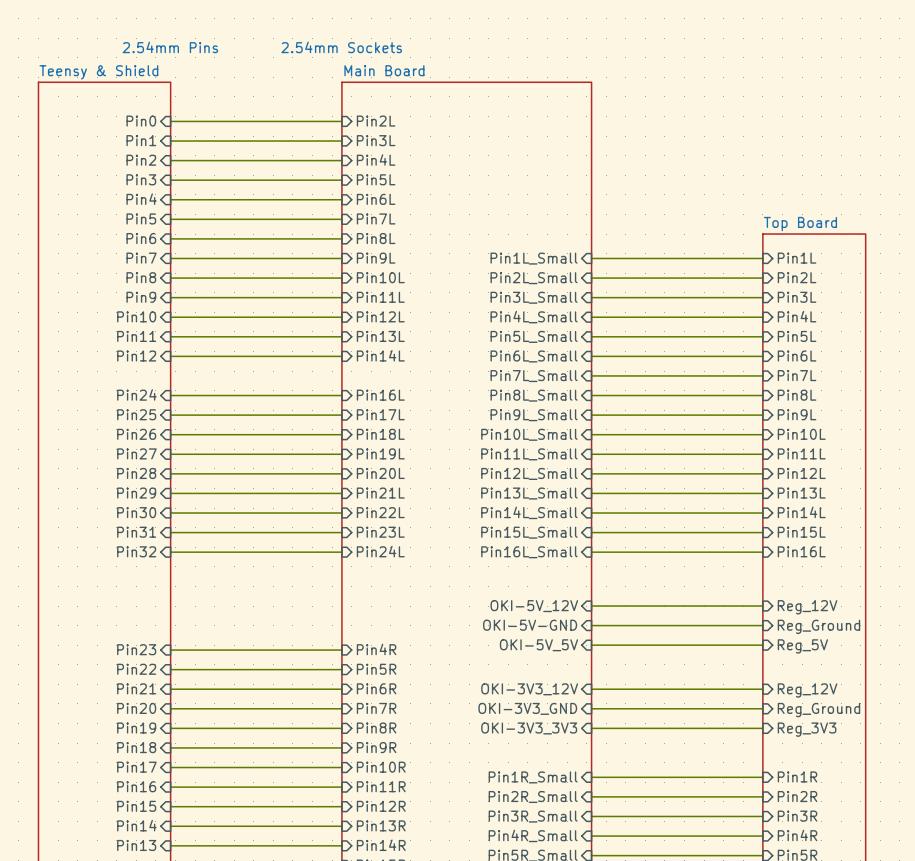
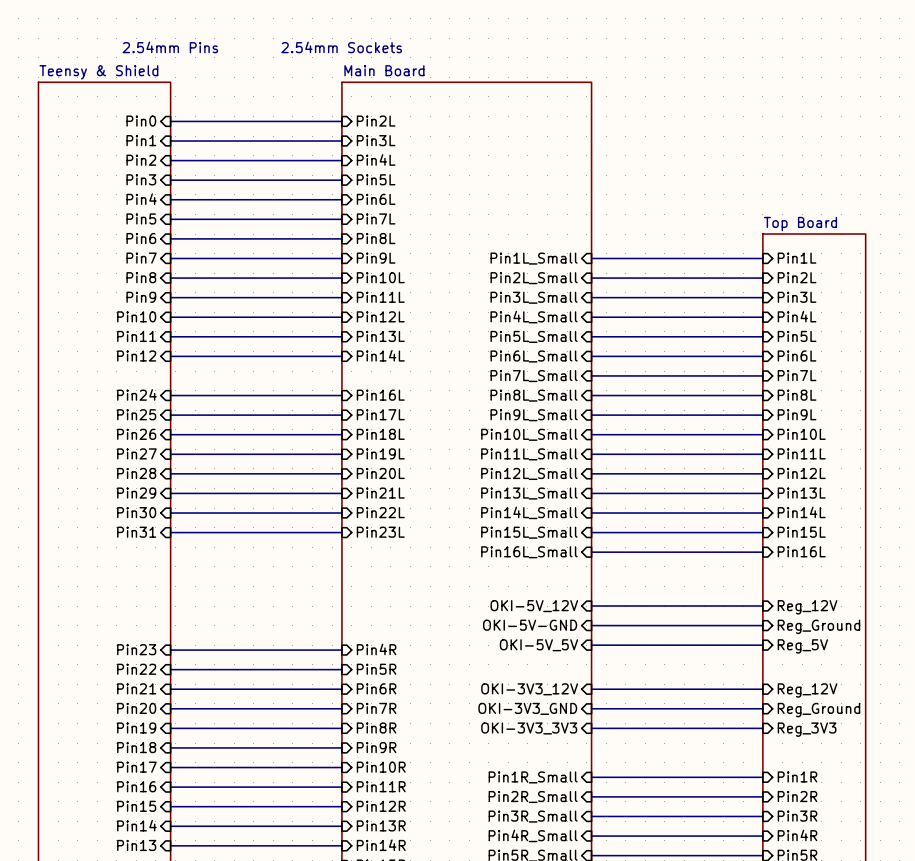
sheet pin: Pin32 (136, 551) -> none
sheet pin: Pin24L (380, 551) -> none
wire: (170, 552) (341, 552) -> none

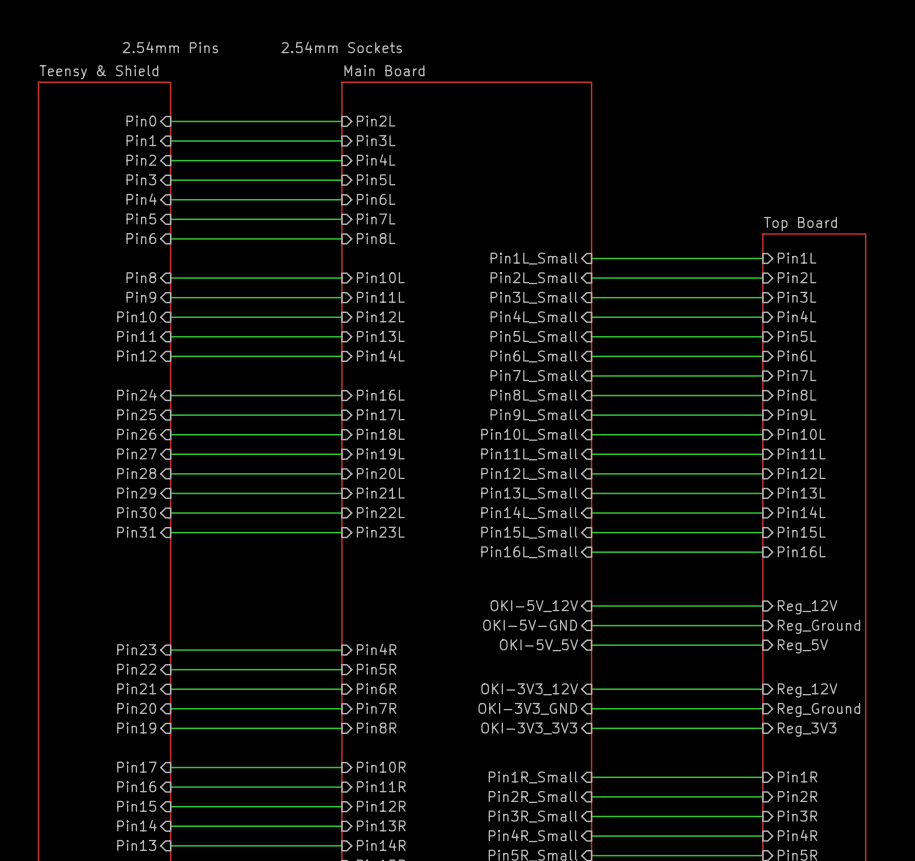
sheet pin: Pin7 (141, 258) -> none
wire: (170, 258) (341, 258) -> none
sheet pin: Pin9L (376, 258) -> none
sheet pin: Pin18 (136, 747) -> none
wire: (170, 747) (341, 747) -> none
sheet pin: Pin9R (376, 747) -> none

